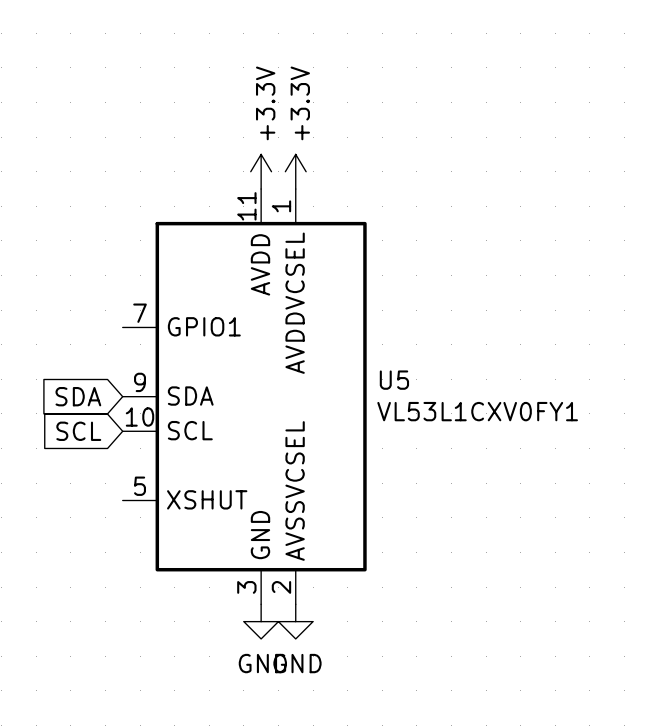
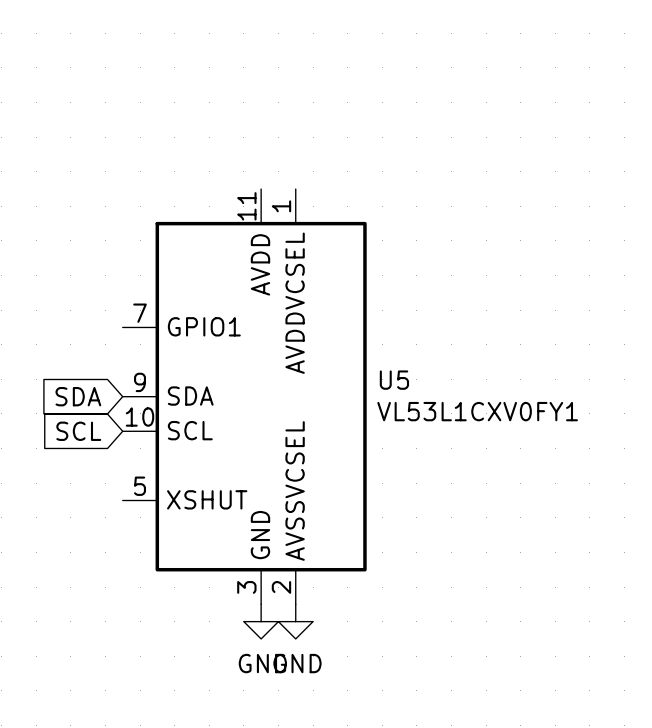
power symbol: +3.3V (261, 171) -> none
power symbol: +3.3V (295, 171) -> none

